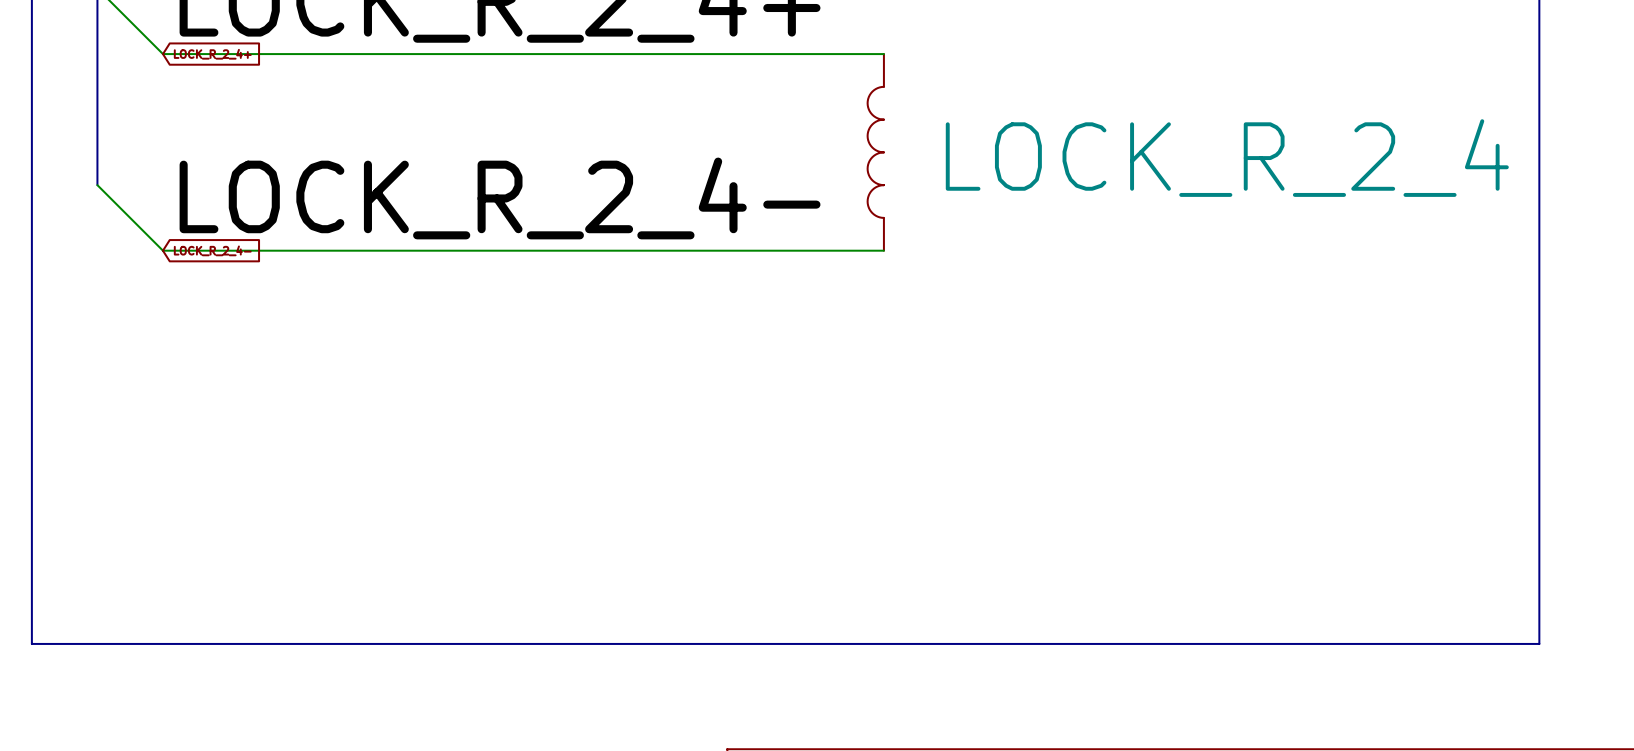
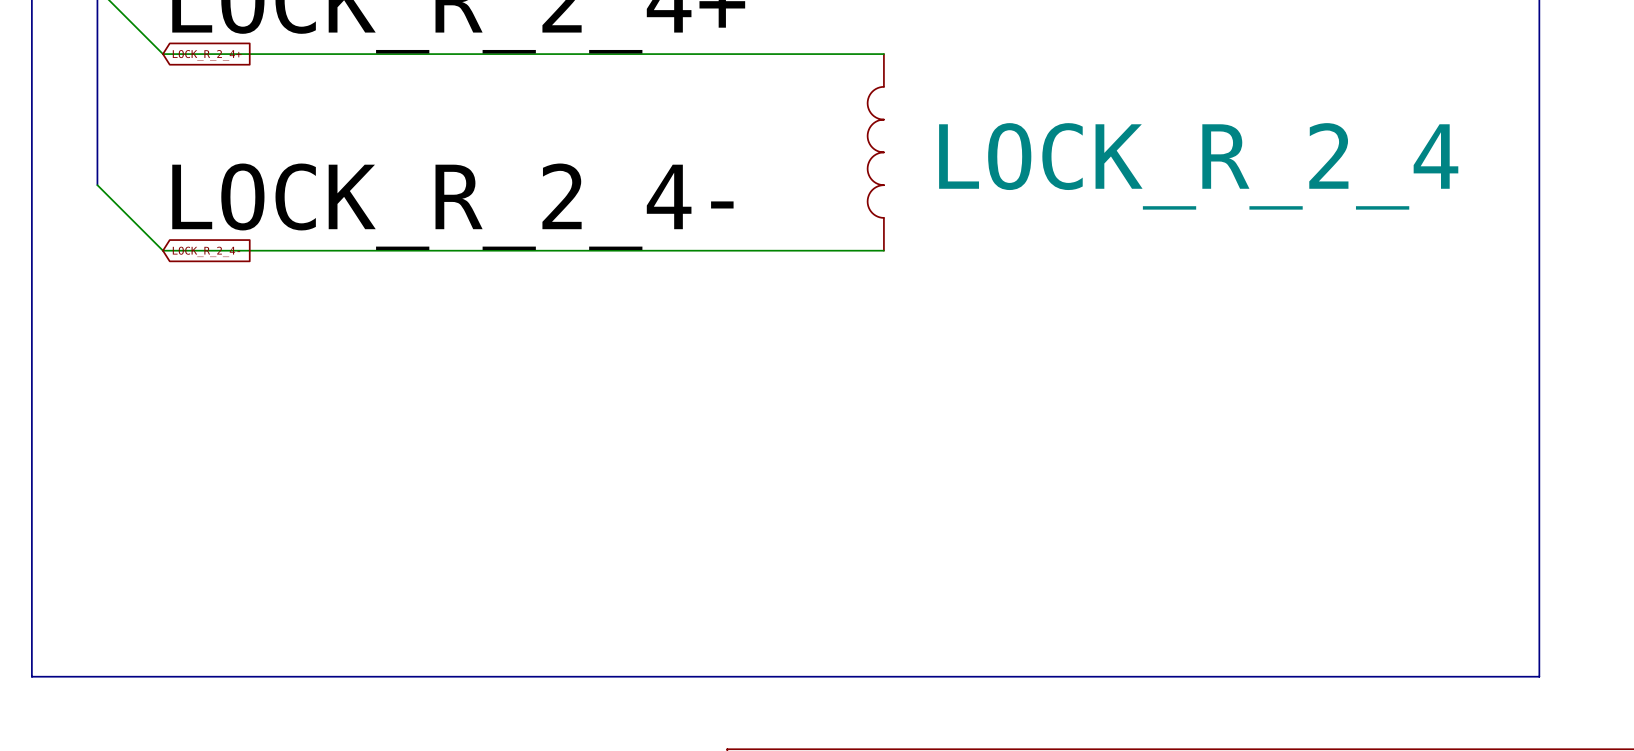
line: (31, 643) (1539, 643) -> (31, 643) (31, 676) (1539, 676) (1539, 643)

